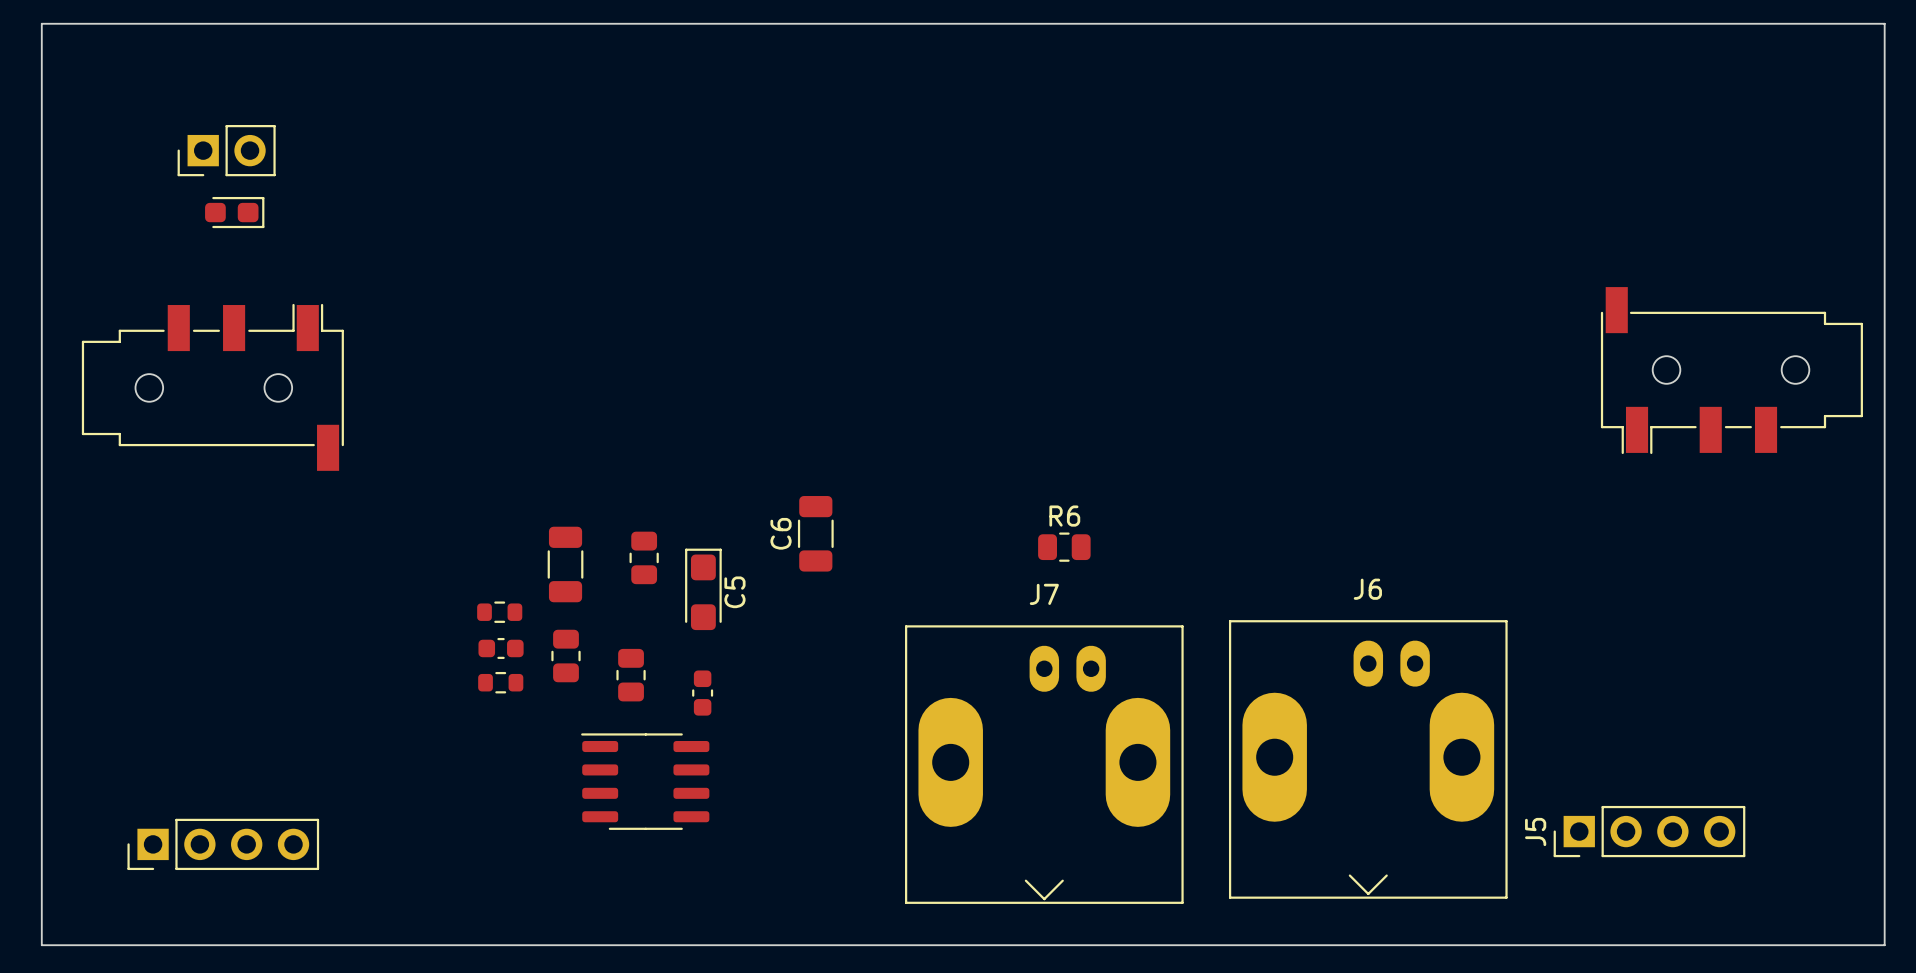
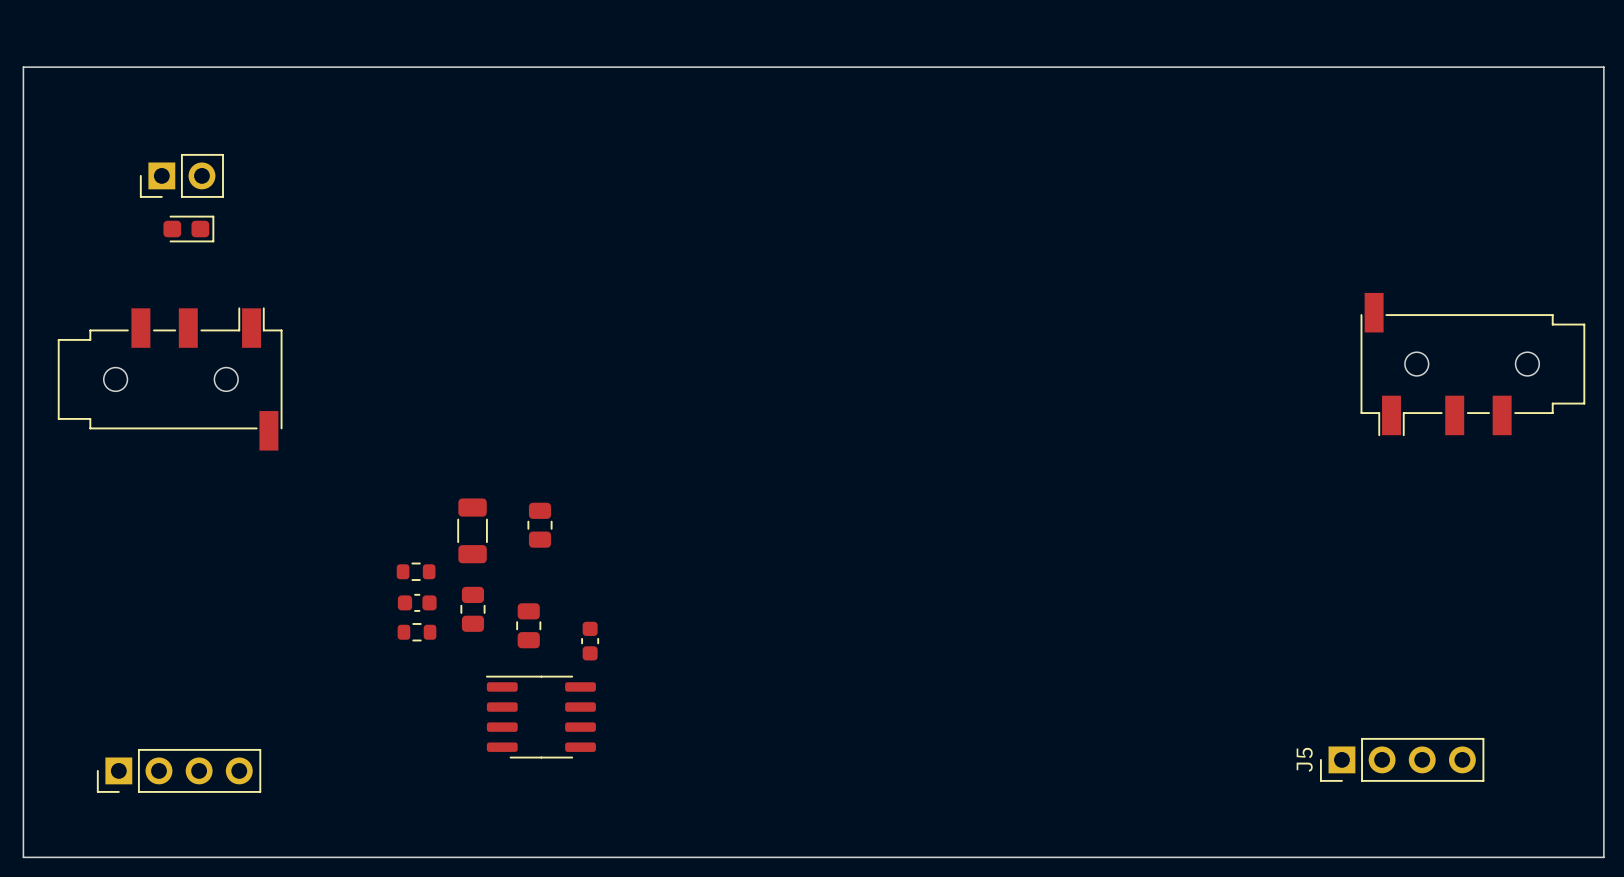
C6: (815, 533) -> none
R6: (1064, 547) -> none
C5: (703, 589) -> none
J6: (1368, 759) -> none
J7: (1044, 764) -> none

